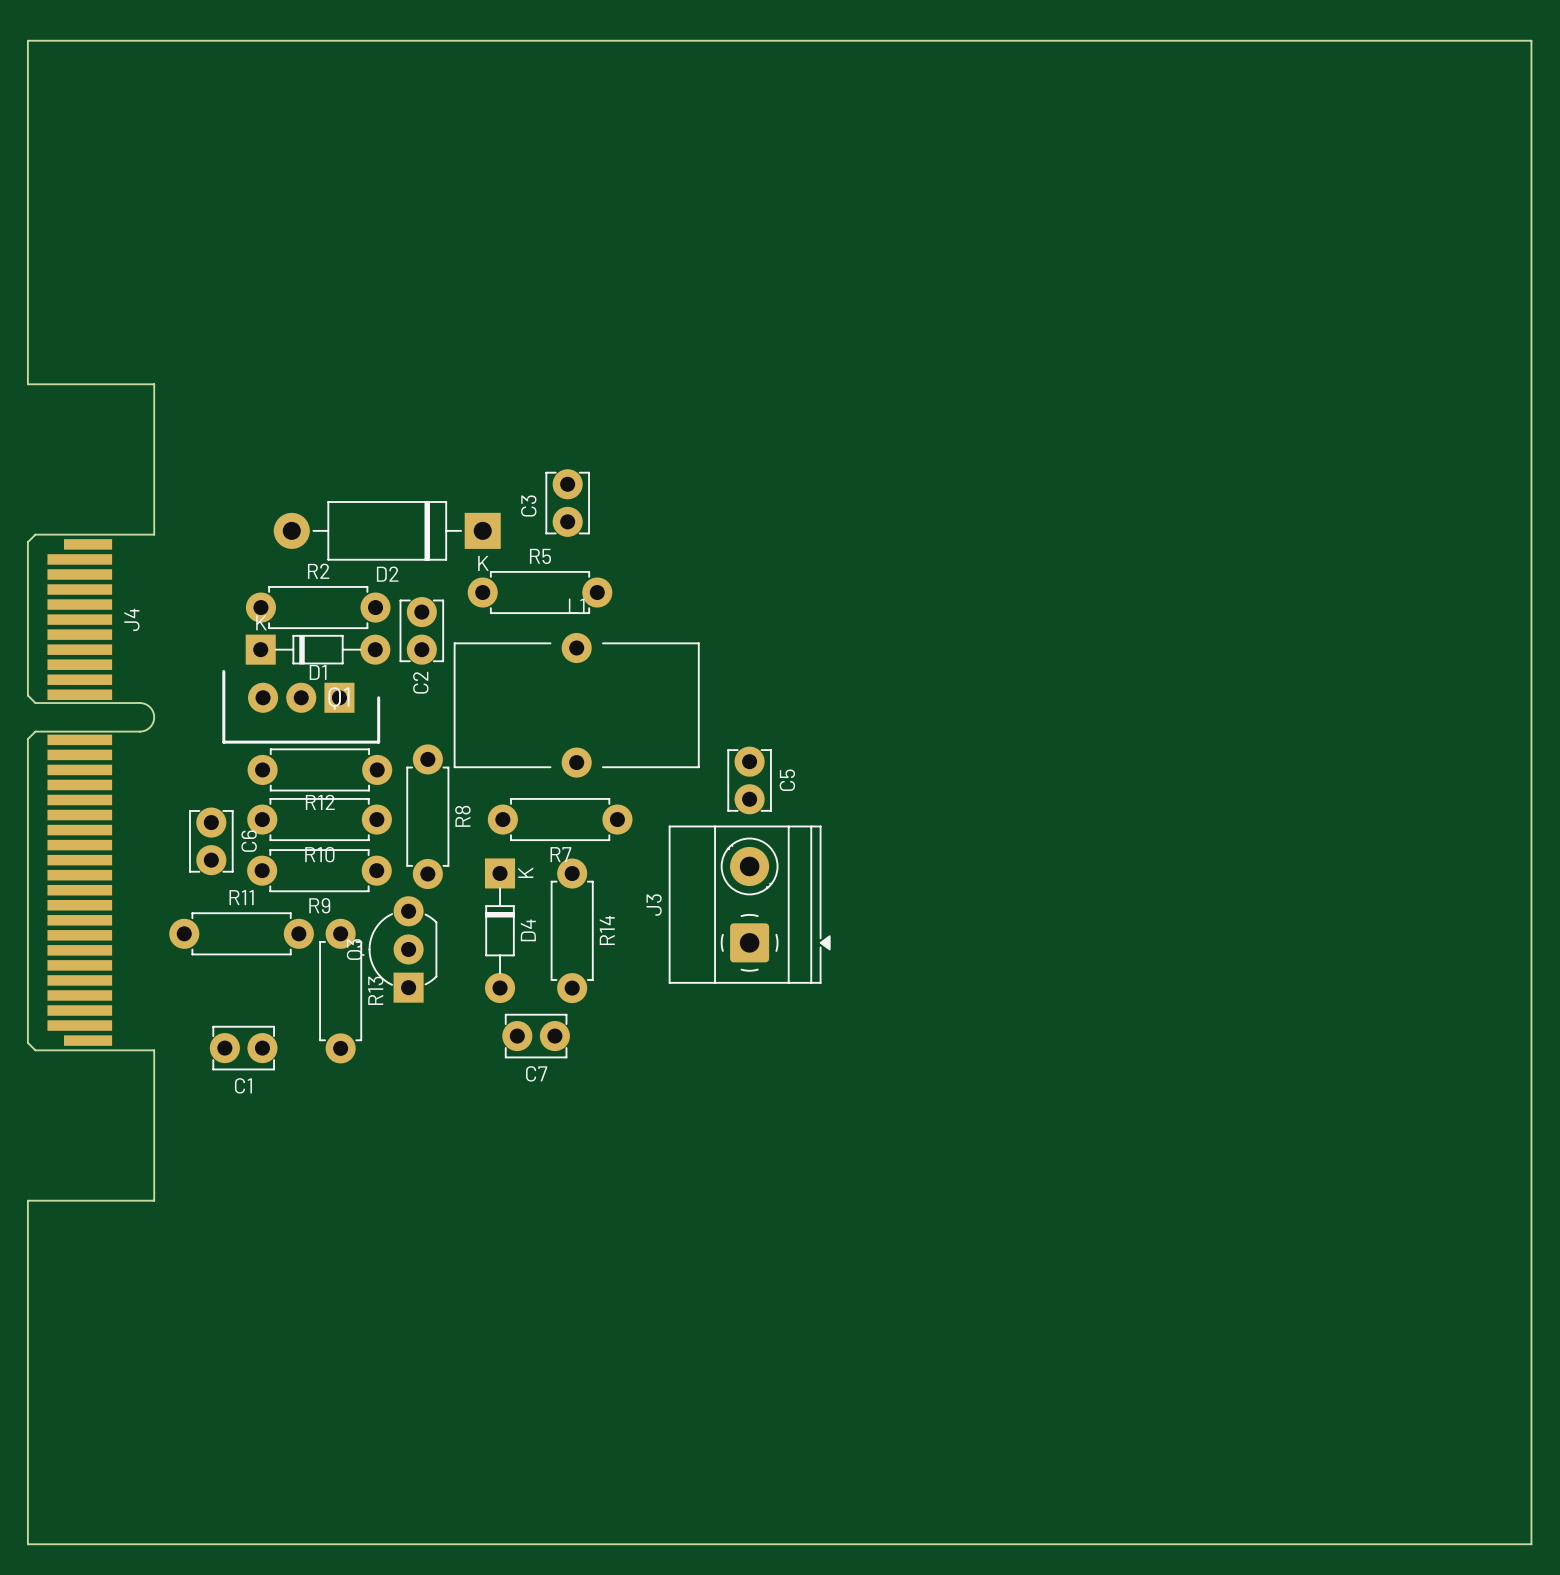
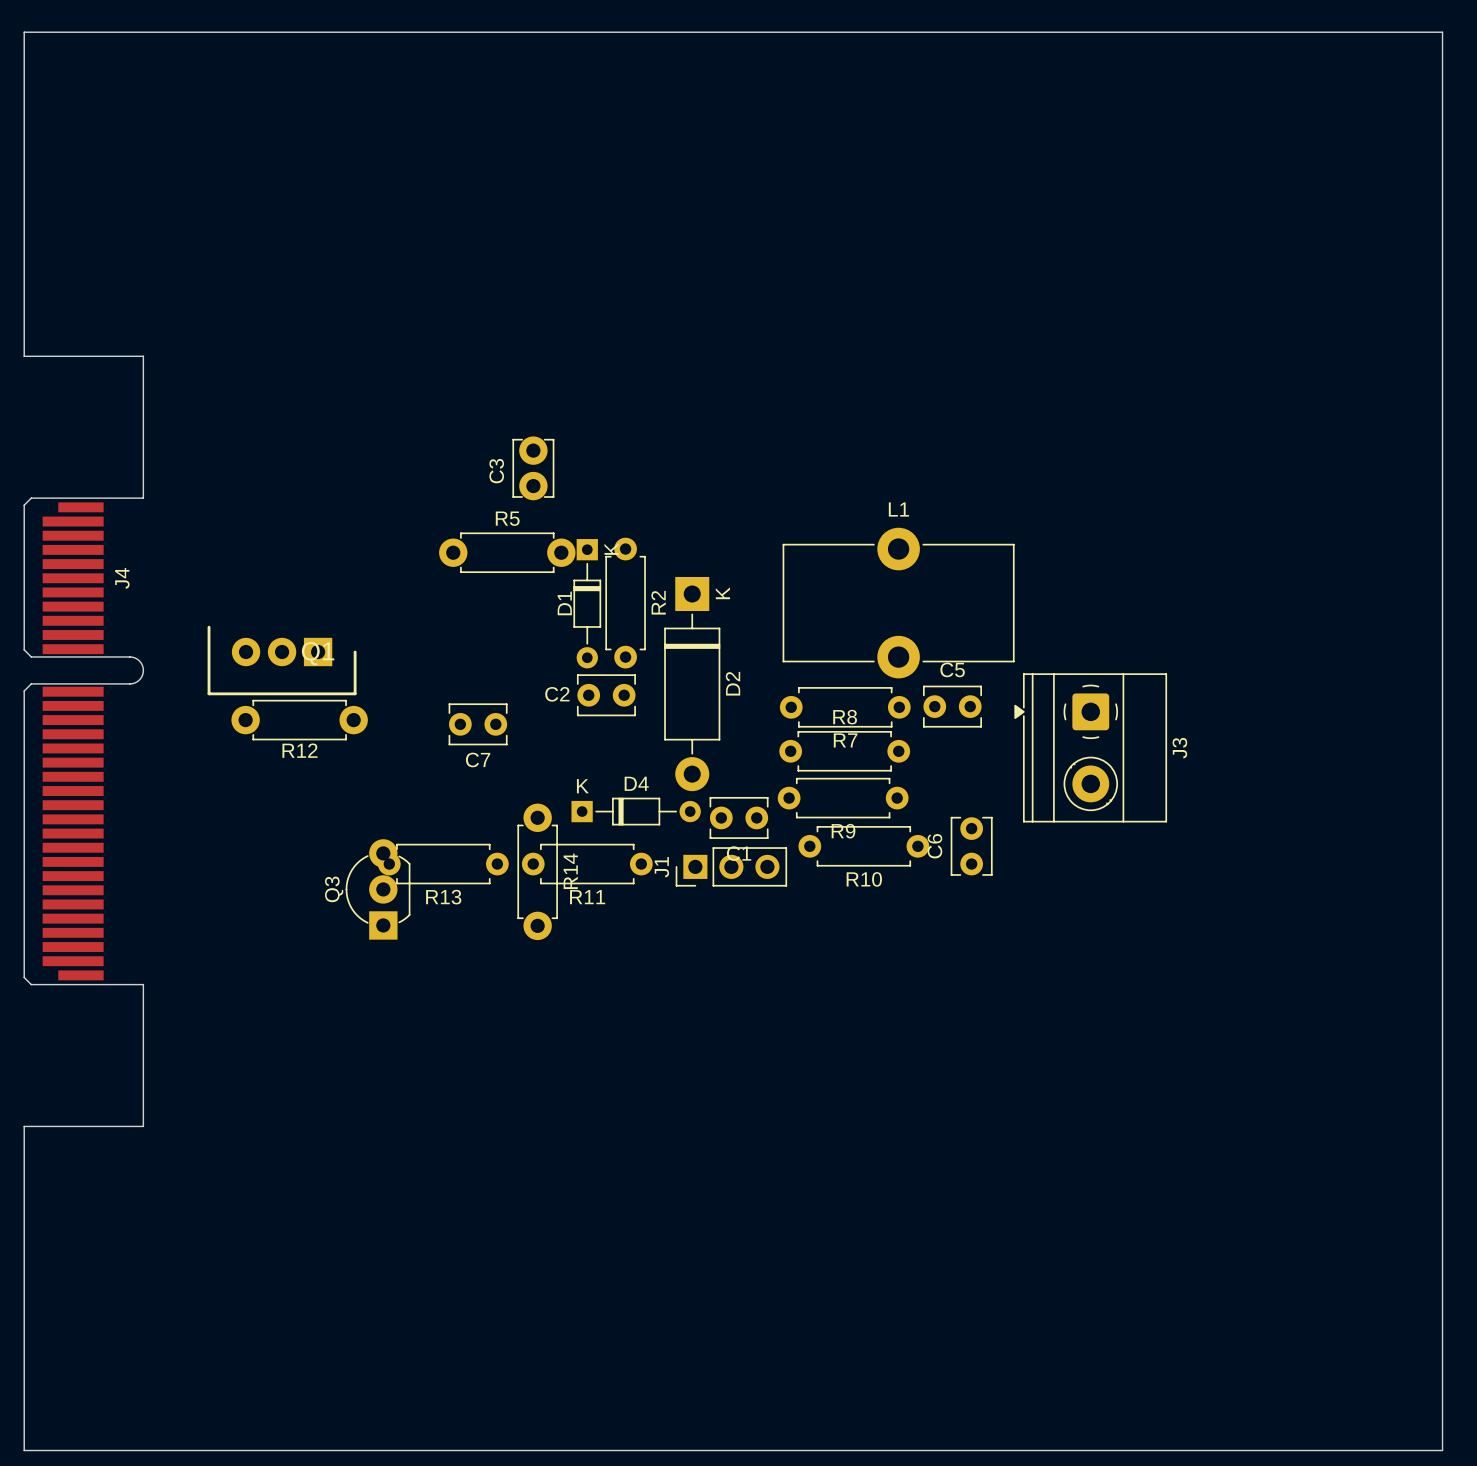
D2 rotation: 0° (387, 530) -> 90° counterclockwise (692, 684)
D2 position: (387, 530) -> (692, 684)
R2 name position: R2 (318, 571) -> R2 (658, 602)
R2 footprint: [245, 586, 391, 630] -> [605, 537, 646, 669]
C2 footprint: [399, 597, 445, 665] -> [576, 674, 636, 717]
L1 footprint: [453, 632, 700, 778] -> [782, 527, 1015, 679]
D1 footprint: [245, 634, 391, 665] -> [573, 539, 602, 669]
D1 name position: D1 (318, 672) -> D1 (564, 603)
C2 name position: C2 (420, 682) -> C2 (557, 694)
R8 footprint: [406, 744, 450, 890] -> [779, 731, 911, 772]
C5 footprint: [727, 746, 772, 815] -> [923, 685, 983, 728]
C5 name position: C5 (787, 780) -> C5 (952, 669)
R10 footprint: [247, 798, 392, 842] -> [798, 826, 930, 867]
R7 footprint: [487, 798, 633, 842] -> [779, 687, 911, 728]
C6 footprint: [189, 807, 234, 876] -> [950, 816, 993, 876]
R8 name position: R8 (462, 816) -> R8 (845, 717)
C6 name position: C6 (249, 841) -> C6 (934, 846)
R9 footprint: [247, 849, 392, 893] -> [777, 777, 909, 819]
D4 footprint: [484, 858, 516, 1004] -> [571, 797, 701, 826]
R11 name position: R11 (241, 897) -> R11 (587, 897)
J3 rotation: 0° (749, 904) -> 180° (1090, 747)
J3 position: (749, 904) -> (1090, 747)
R11 footprint: [169, 912, 314, 956] -> [521, 843, 653, 885]
R13 footprint: [319, 918, 363, 1064] -> [377, 843, 509, 885]
J1: none -> (731, 866)
D4 name position: D4 (528, 930) -> D4 (636, 783)
R13 name position: R13 (375, 990) -> R13 (443, 897)
C7 footprint: [502, 1013, 570, 1059] -> [448, 703, 508, 746]
C1 footprint: [209, 1025, 278, 1071] -> [709, 796, 769, 839]

